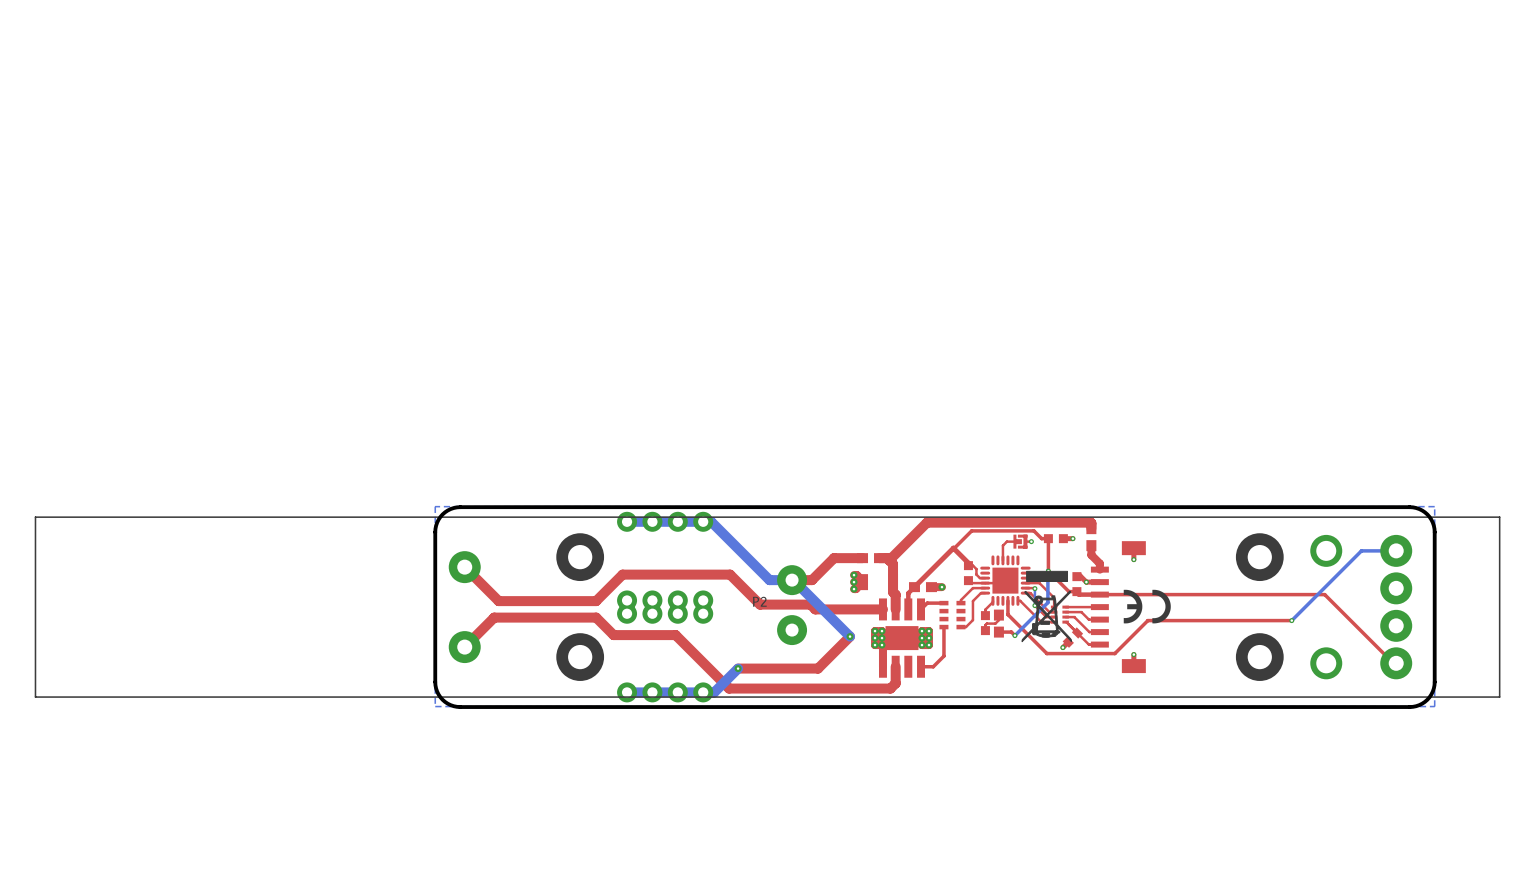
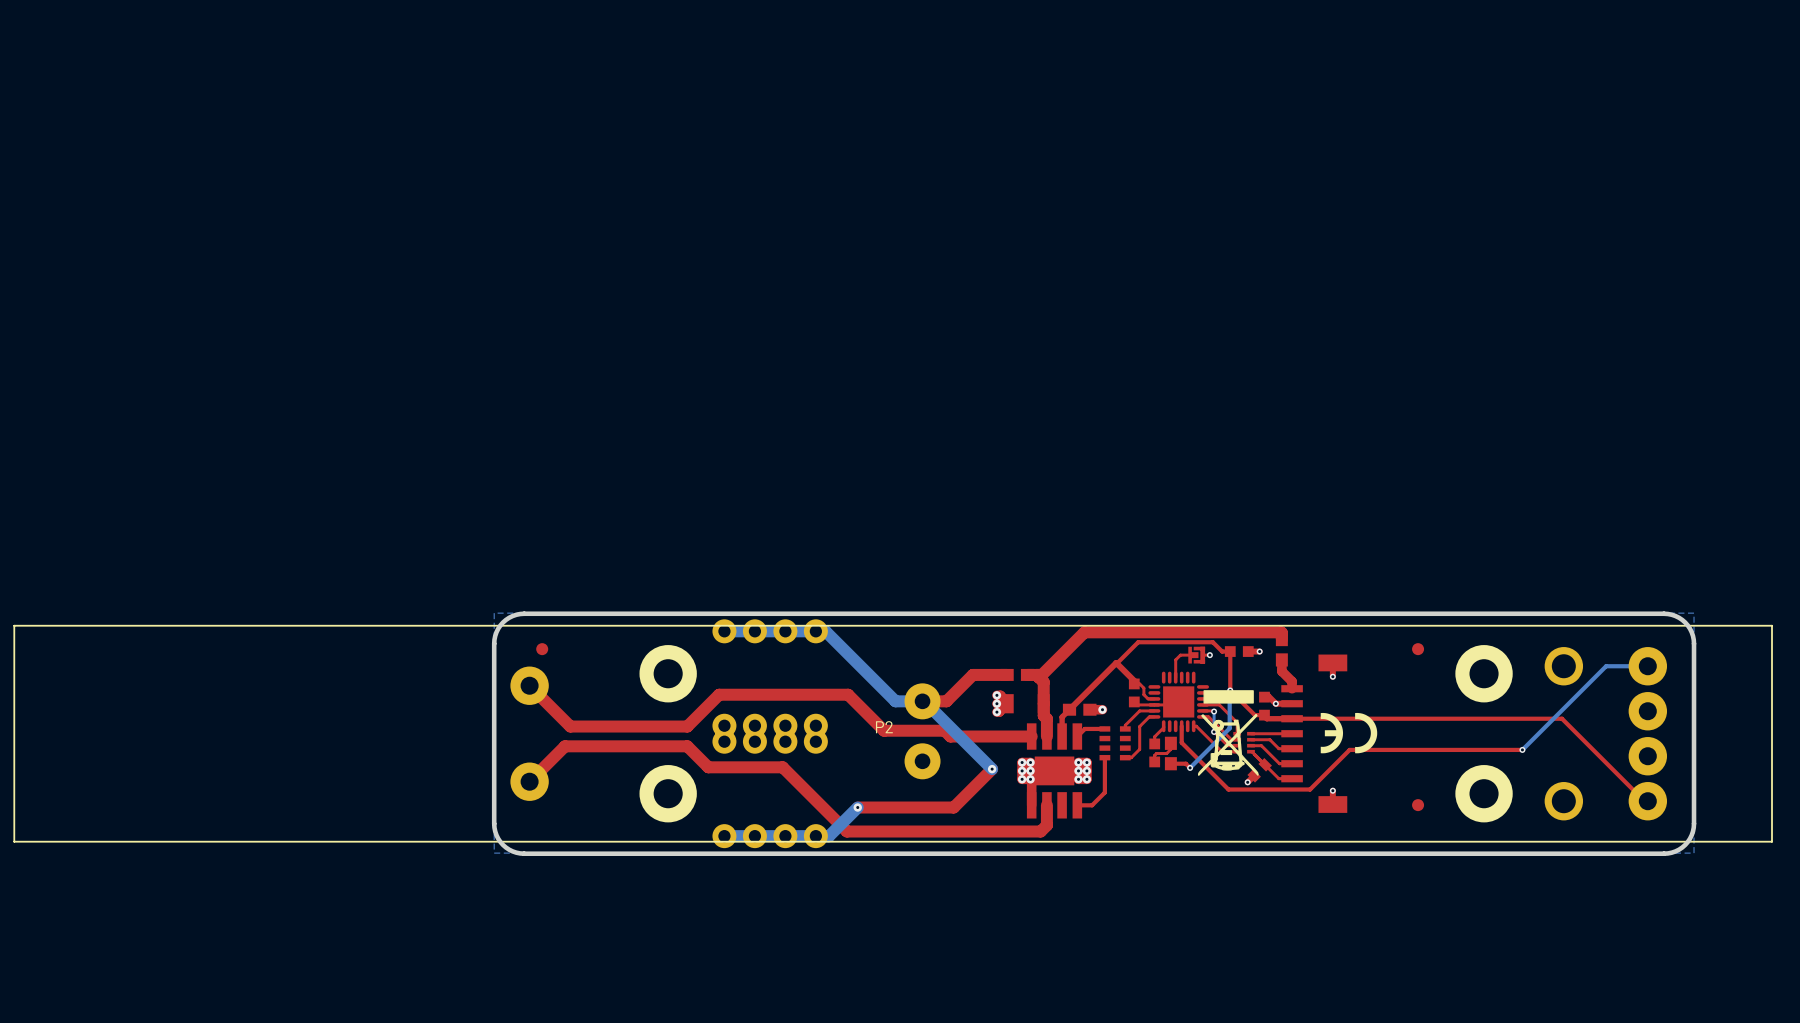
part: none -> (542, 649)
part: none -> (1418, 649)
part: none -> (1418, 805)

